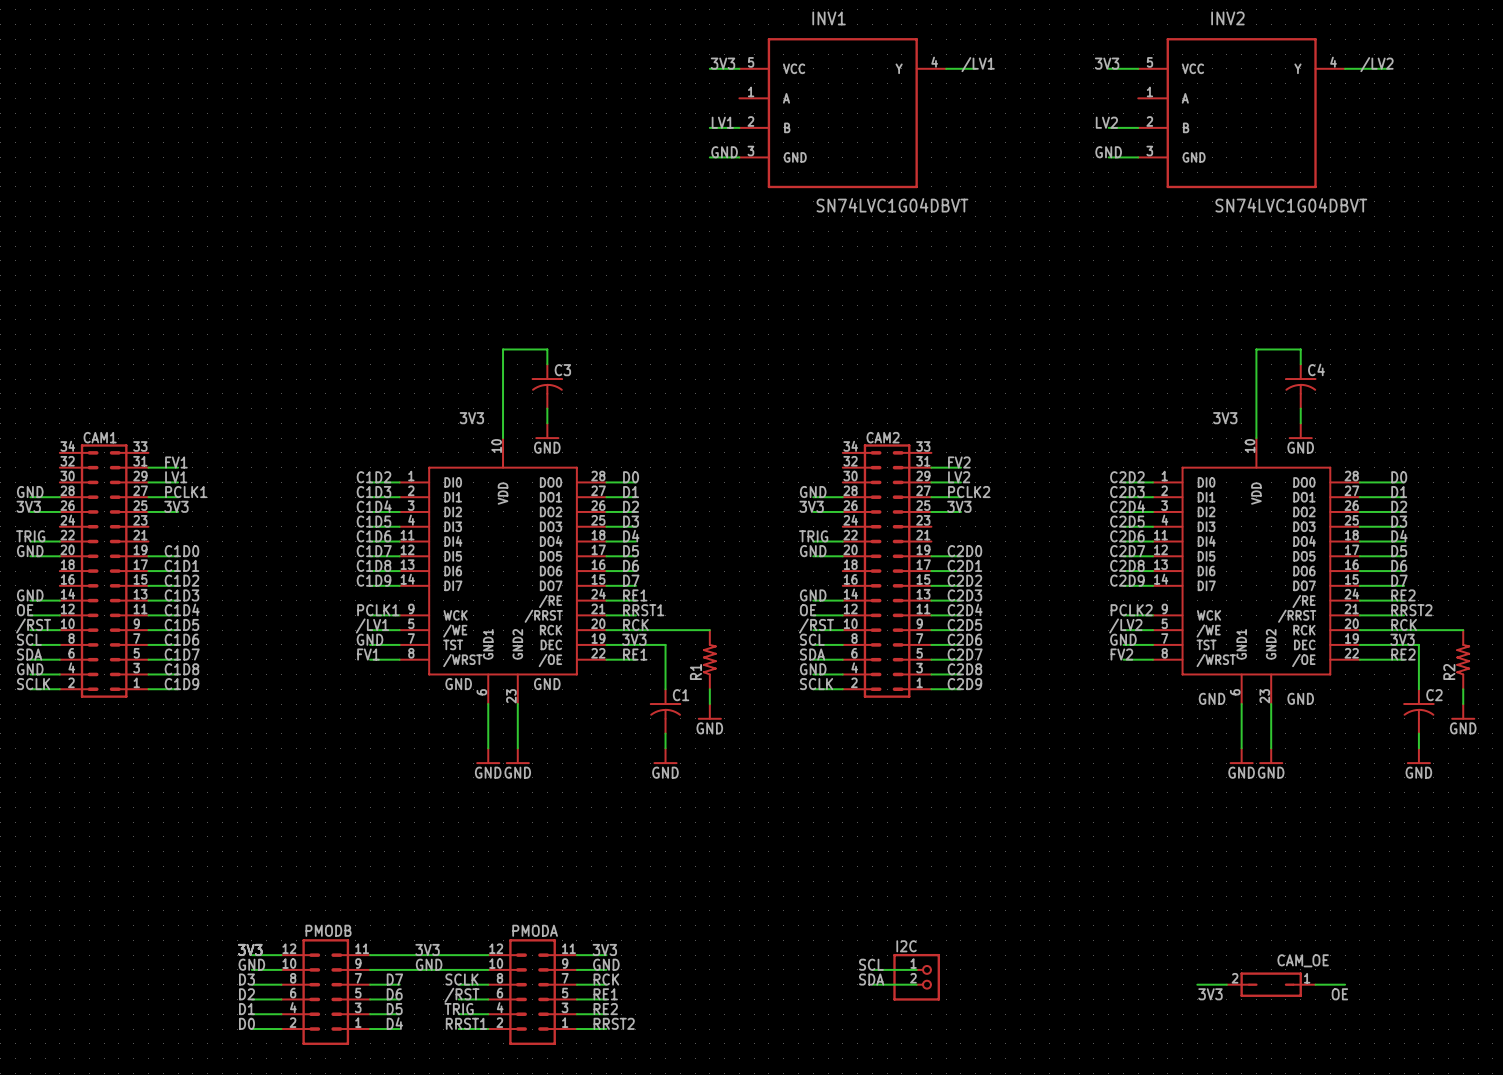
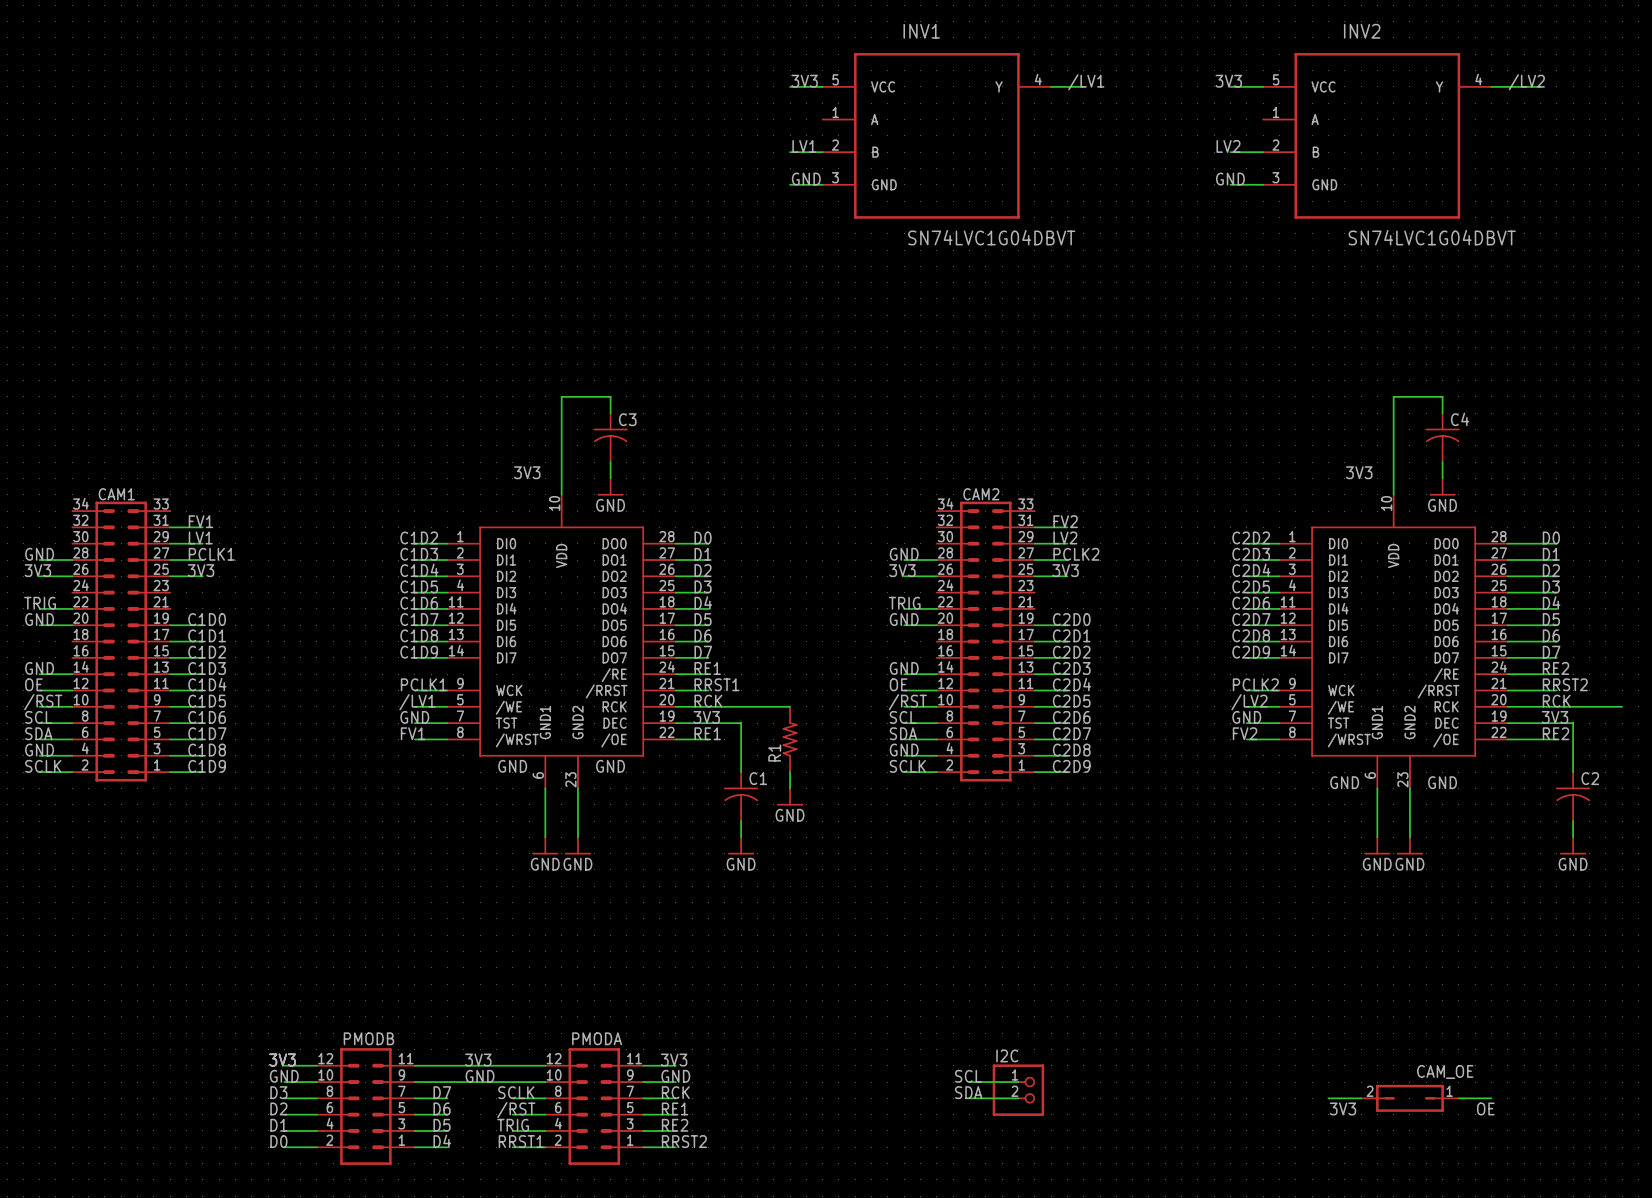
R2: (1463, 659) -> none
wire: (1463, 689) (1463, 704) -> none
power symbol: GND (1463, 711) -> none

